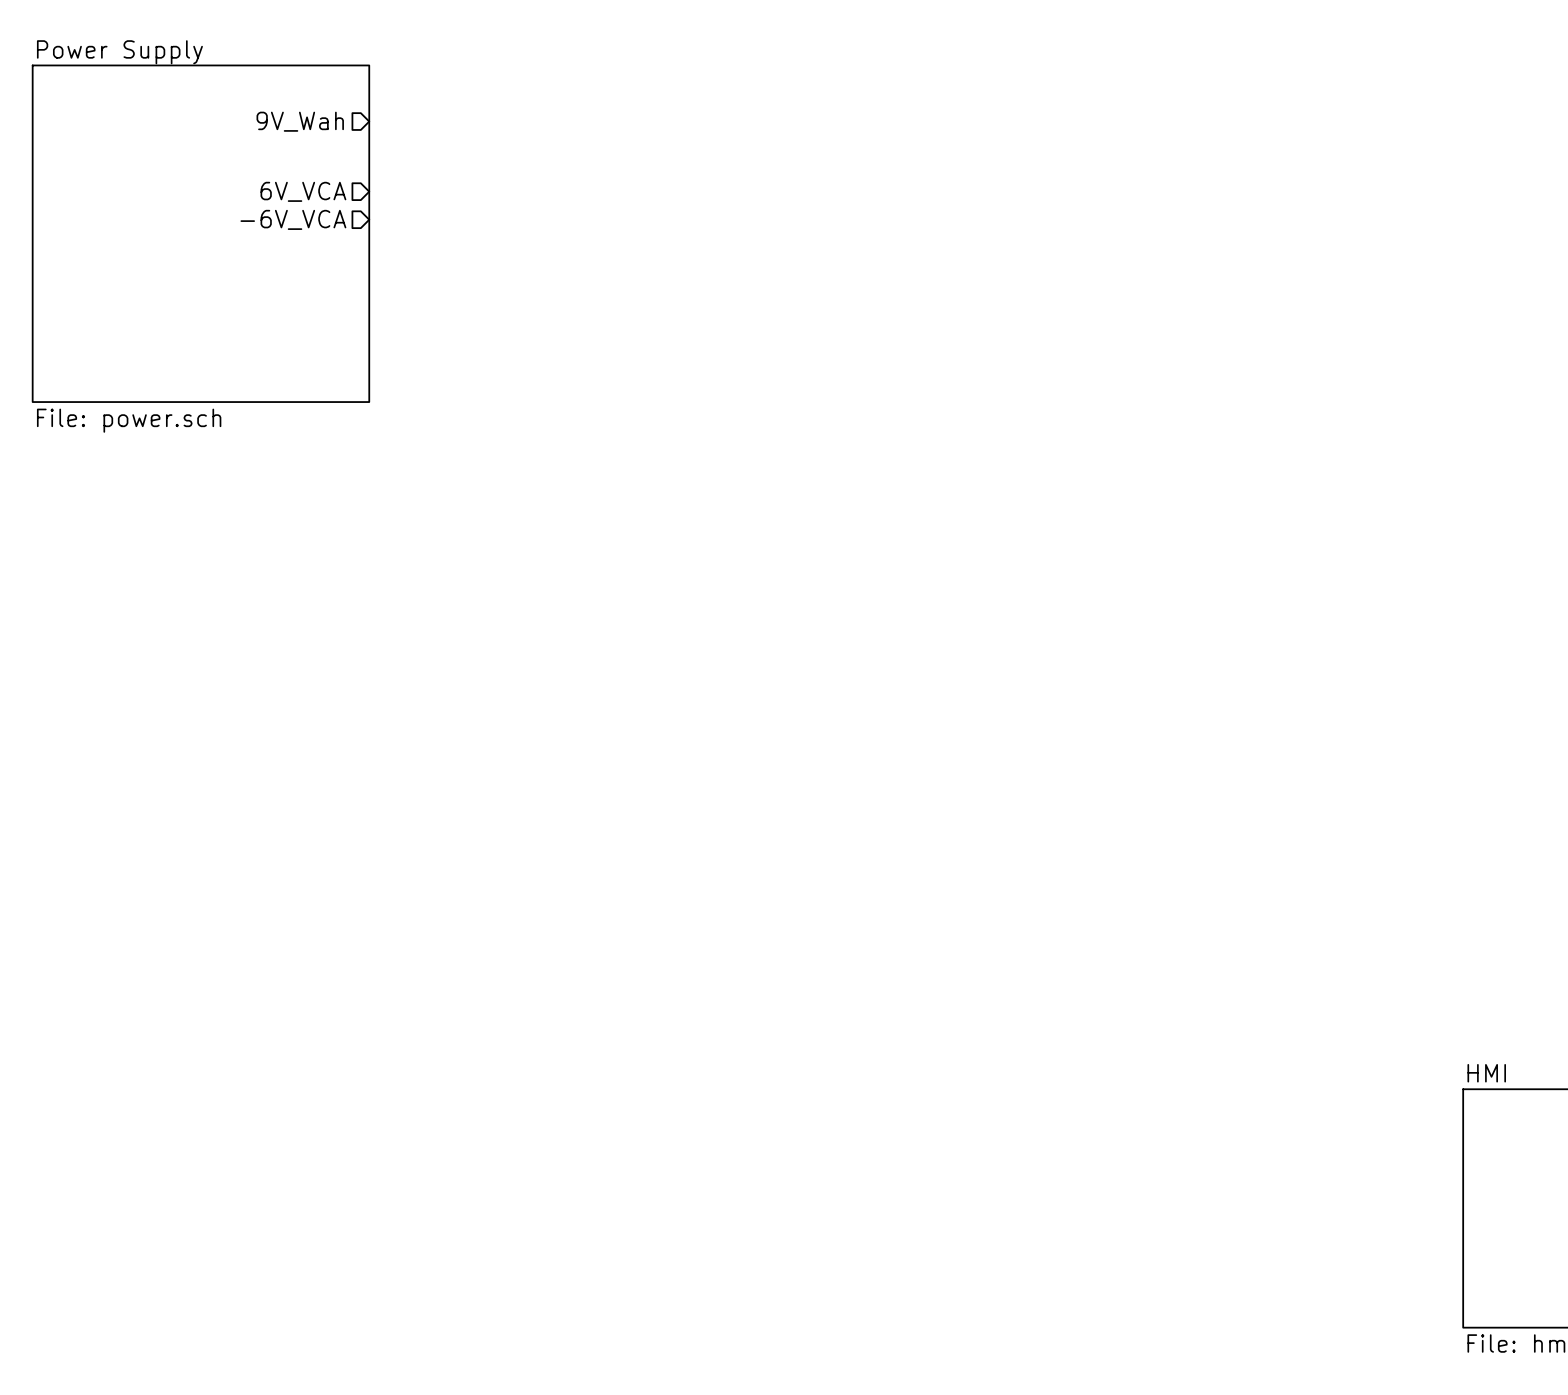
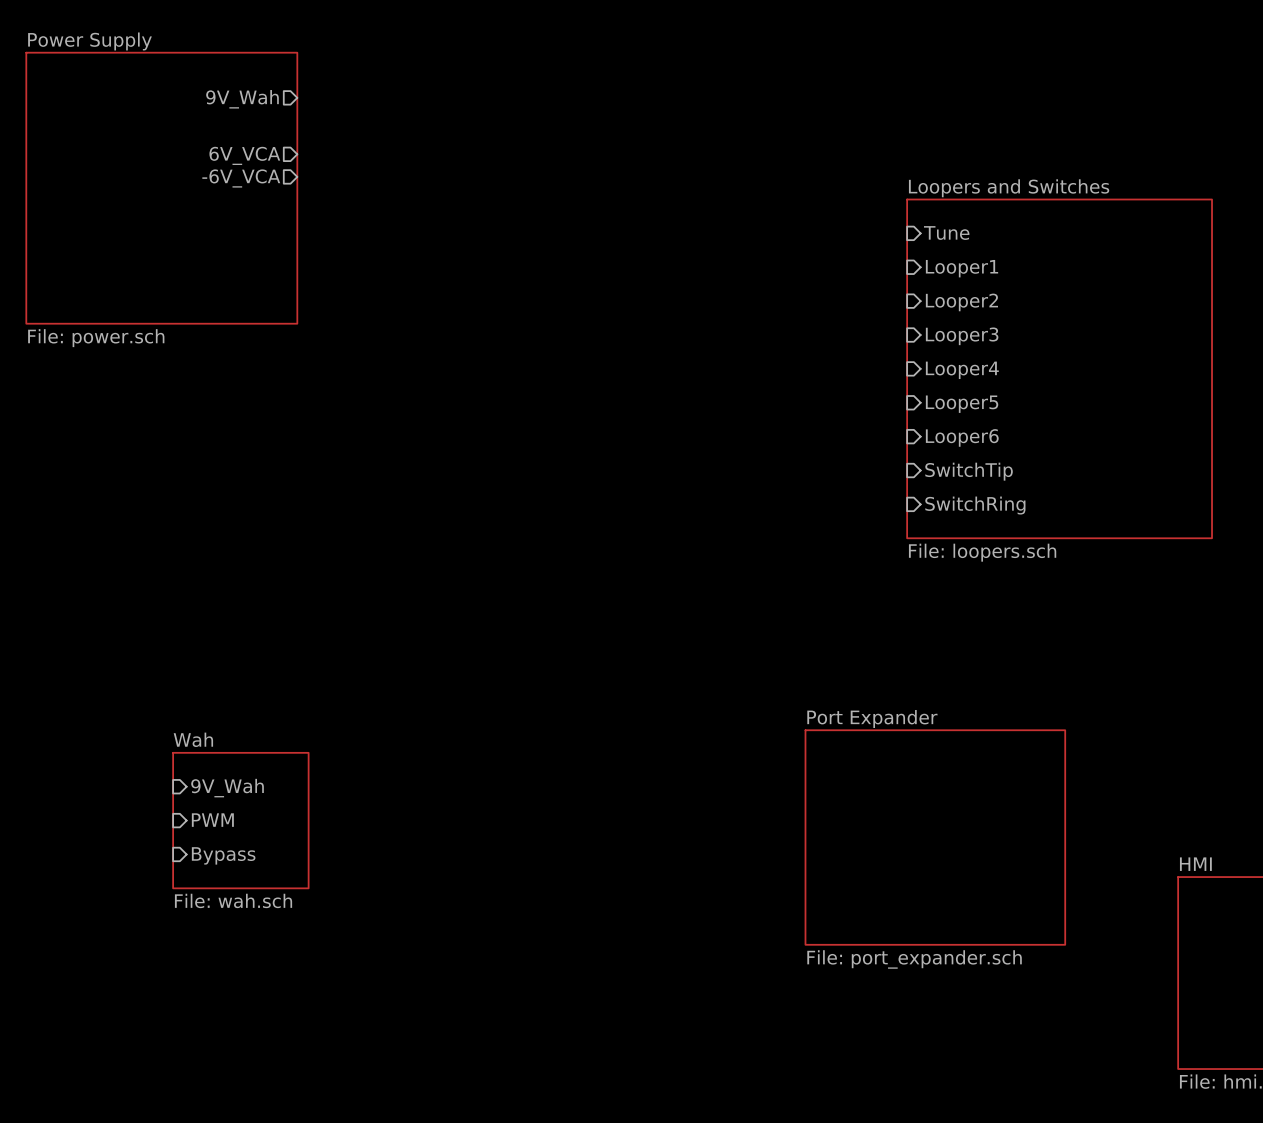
sheet pin: none -> Tune (946, 233)
sheet pin: none -> Looper1 (962, 268)
sheet pin: none -> Looper2 (961, 302)
sheet pin: none -> Looper3 (962, 336)
sheet Loopers and Switches: none -> File: loopers.sch (1059, 368)
sheet pin: none -> Looper4 (962, 370)
sheet pin: none -> Looper5 (962, 404)
sheet pin: none -> Looper6 (962, 437)
sheet pin: none -> SwitchTip (969, 471)
sheet pin: none -> SwitchRing (975, 505)
sheet pin: none -> 9V_Wah (227, 788)
sheet pin: none -> PWM (212, 820)
sheet Wah: none -> File: wah.sch (240, 820)
sheet Port Expander: none -> File: port_expander.sch (935, 837)
sheet pin: none -> Bypass (223, 855)

